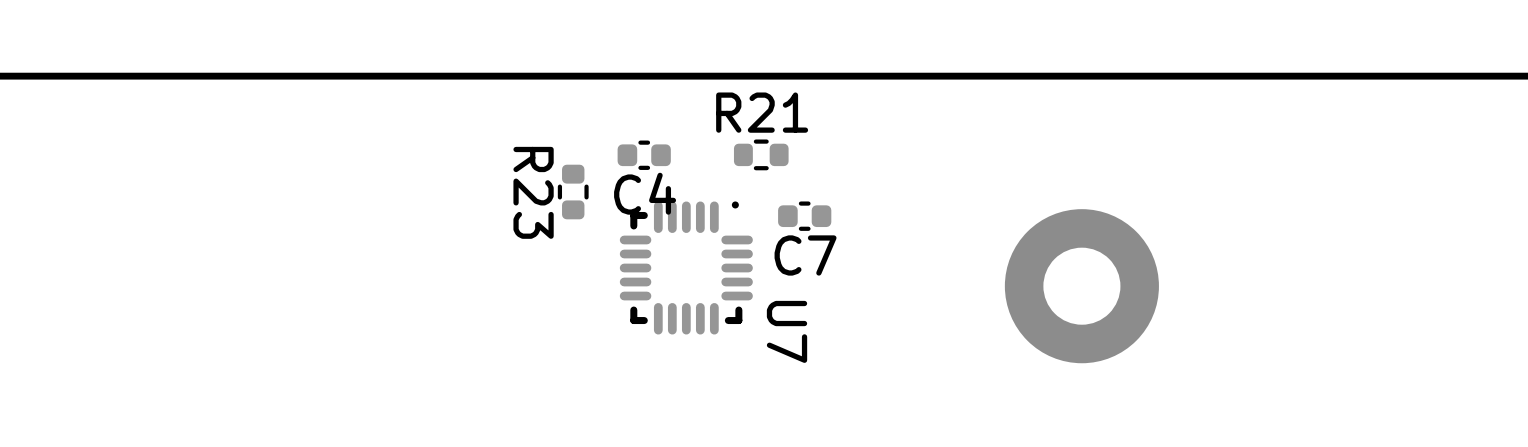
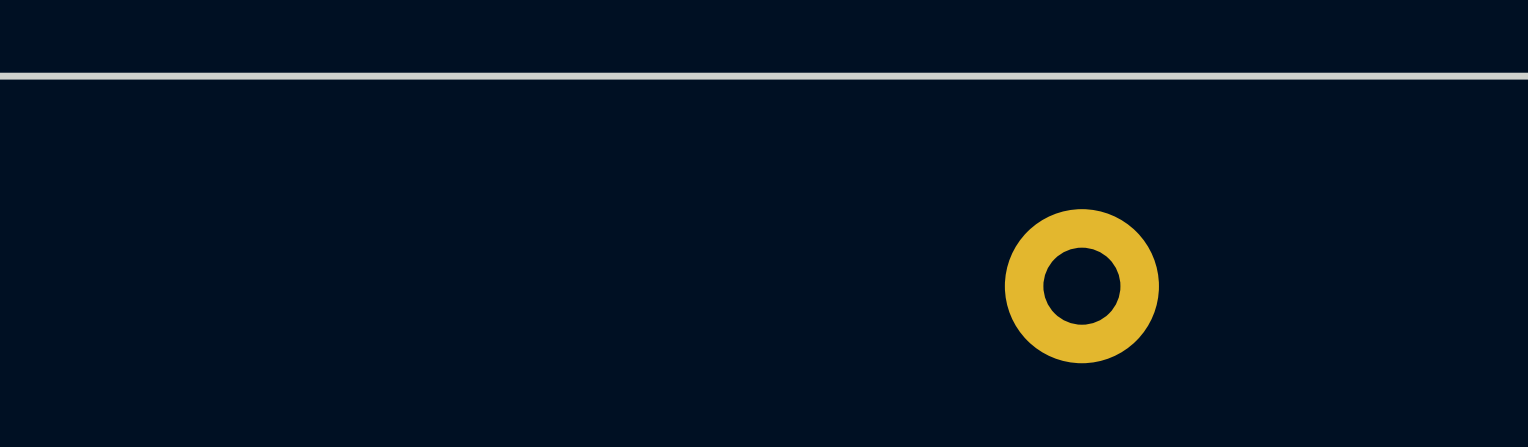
R21: (761, 154) -> none
C4: (644, 155) -> none
R23: (573, 192) -> none
C7: (804, 216) -> none
U7: (686, 268) -> none

